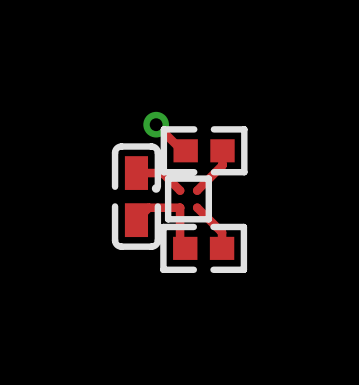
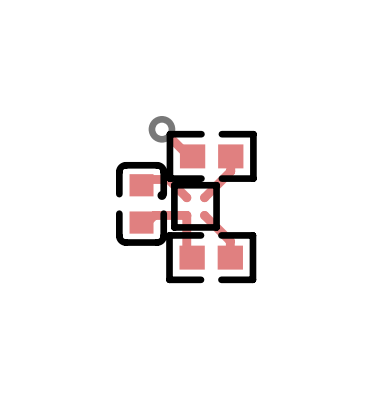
part footprint: [111, 143, 162, 250] -> [116, 161, 168, 246]

